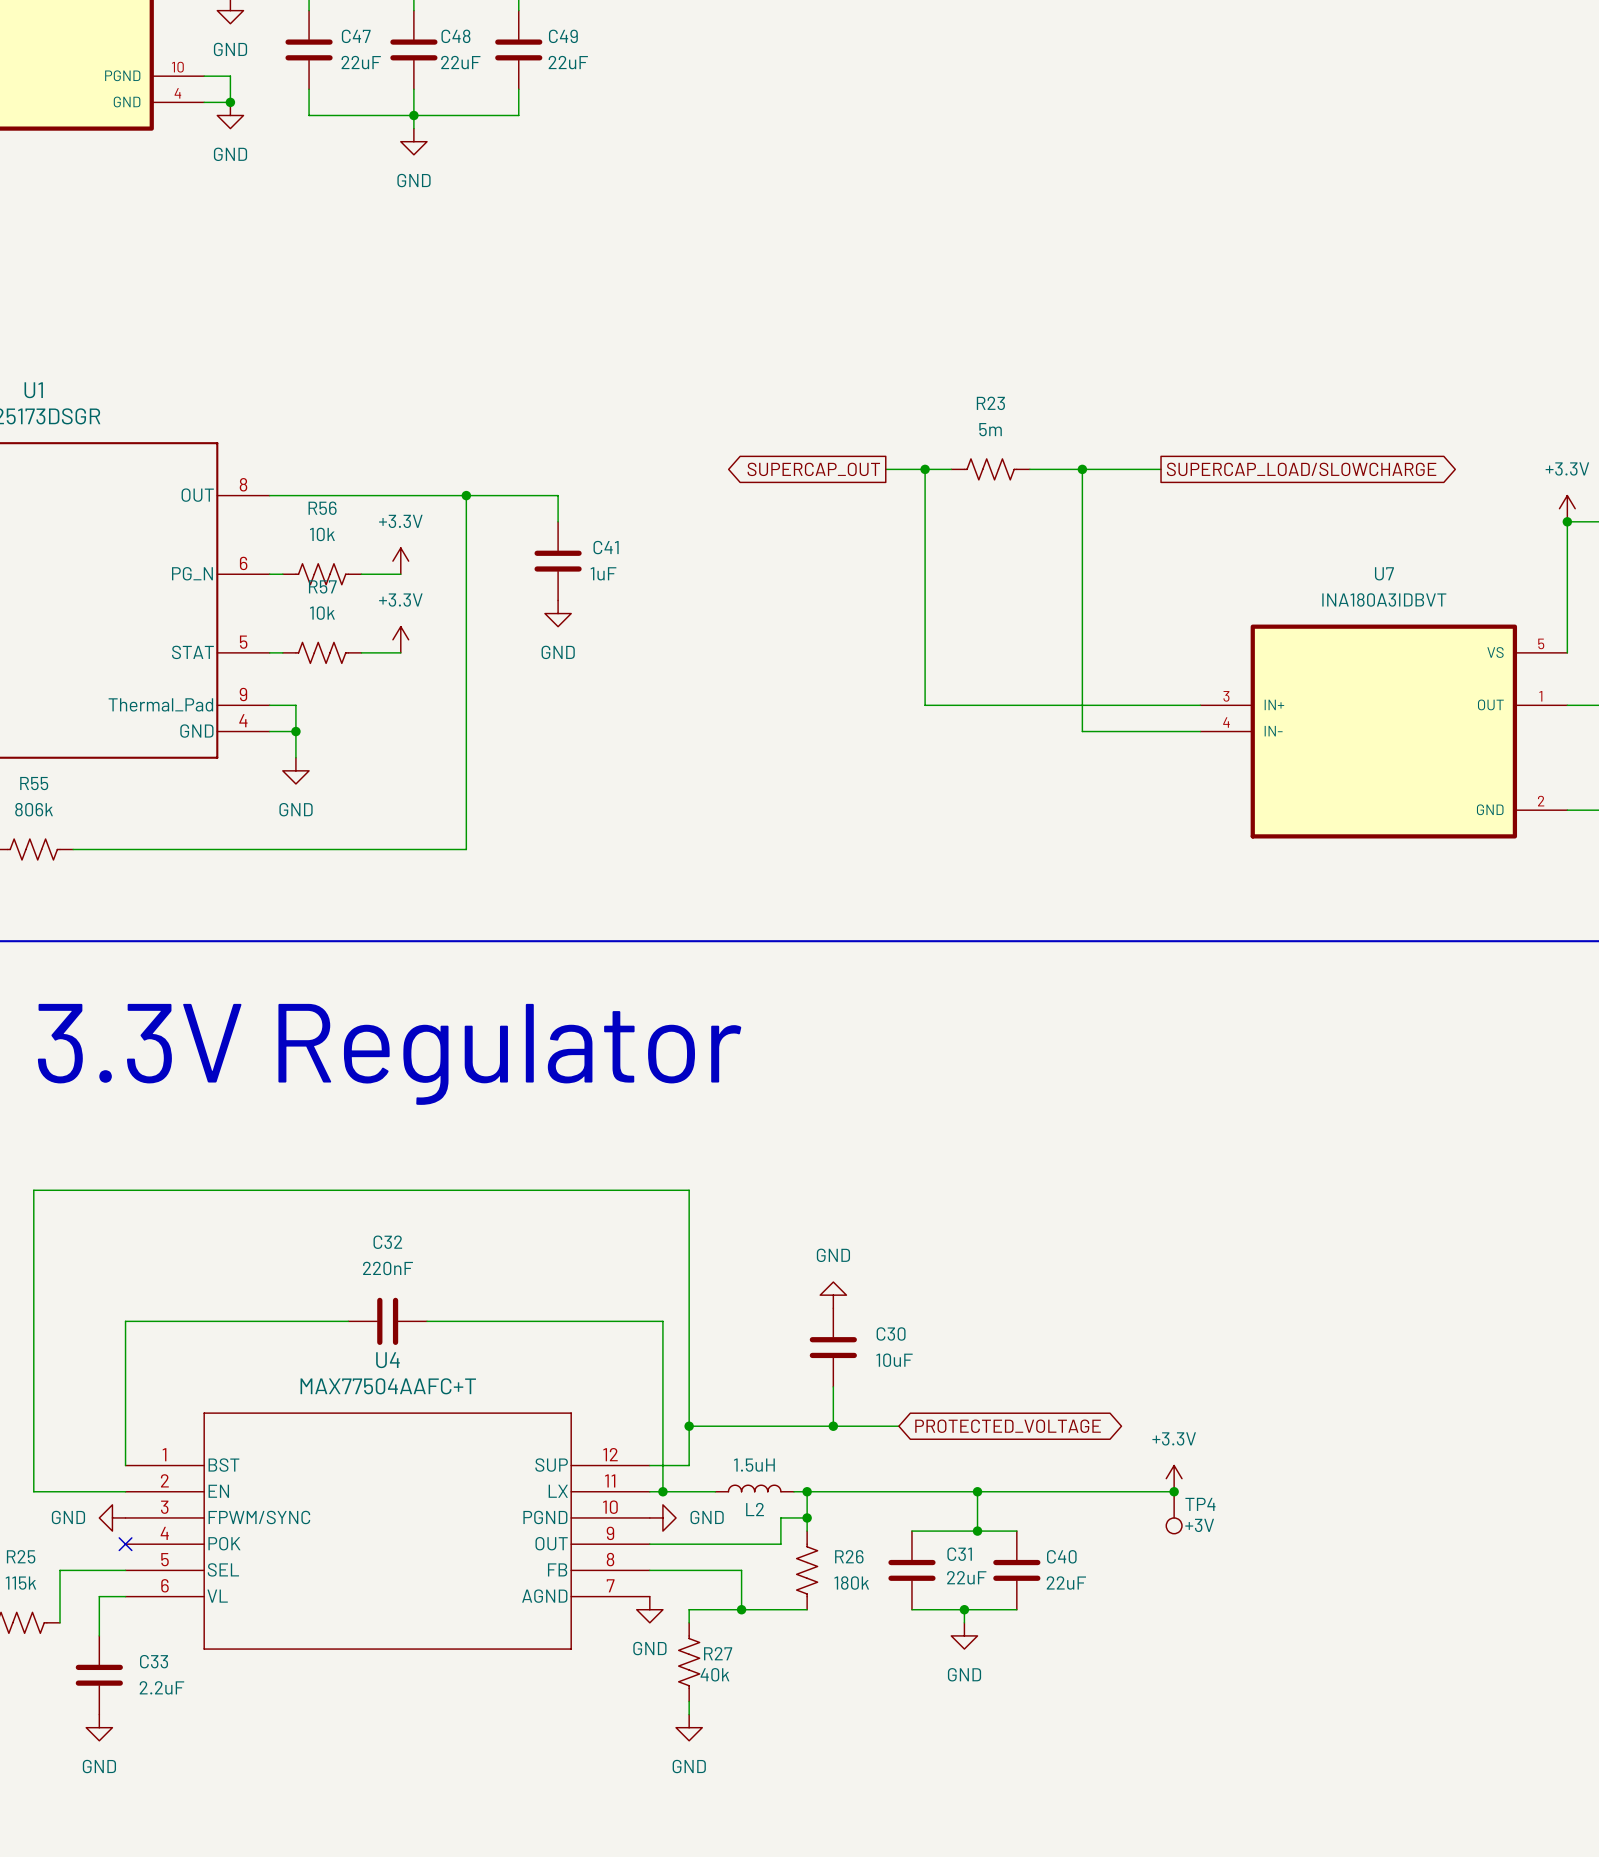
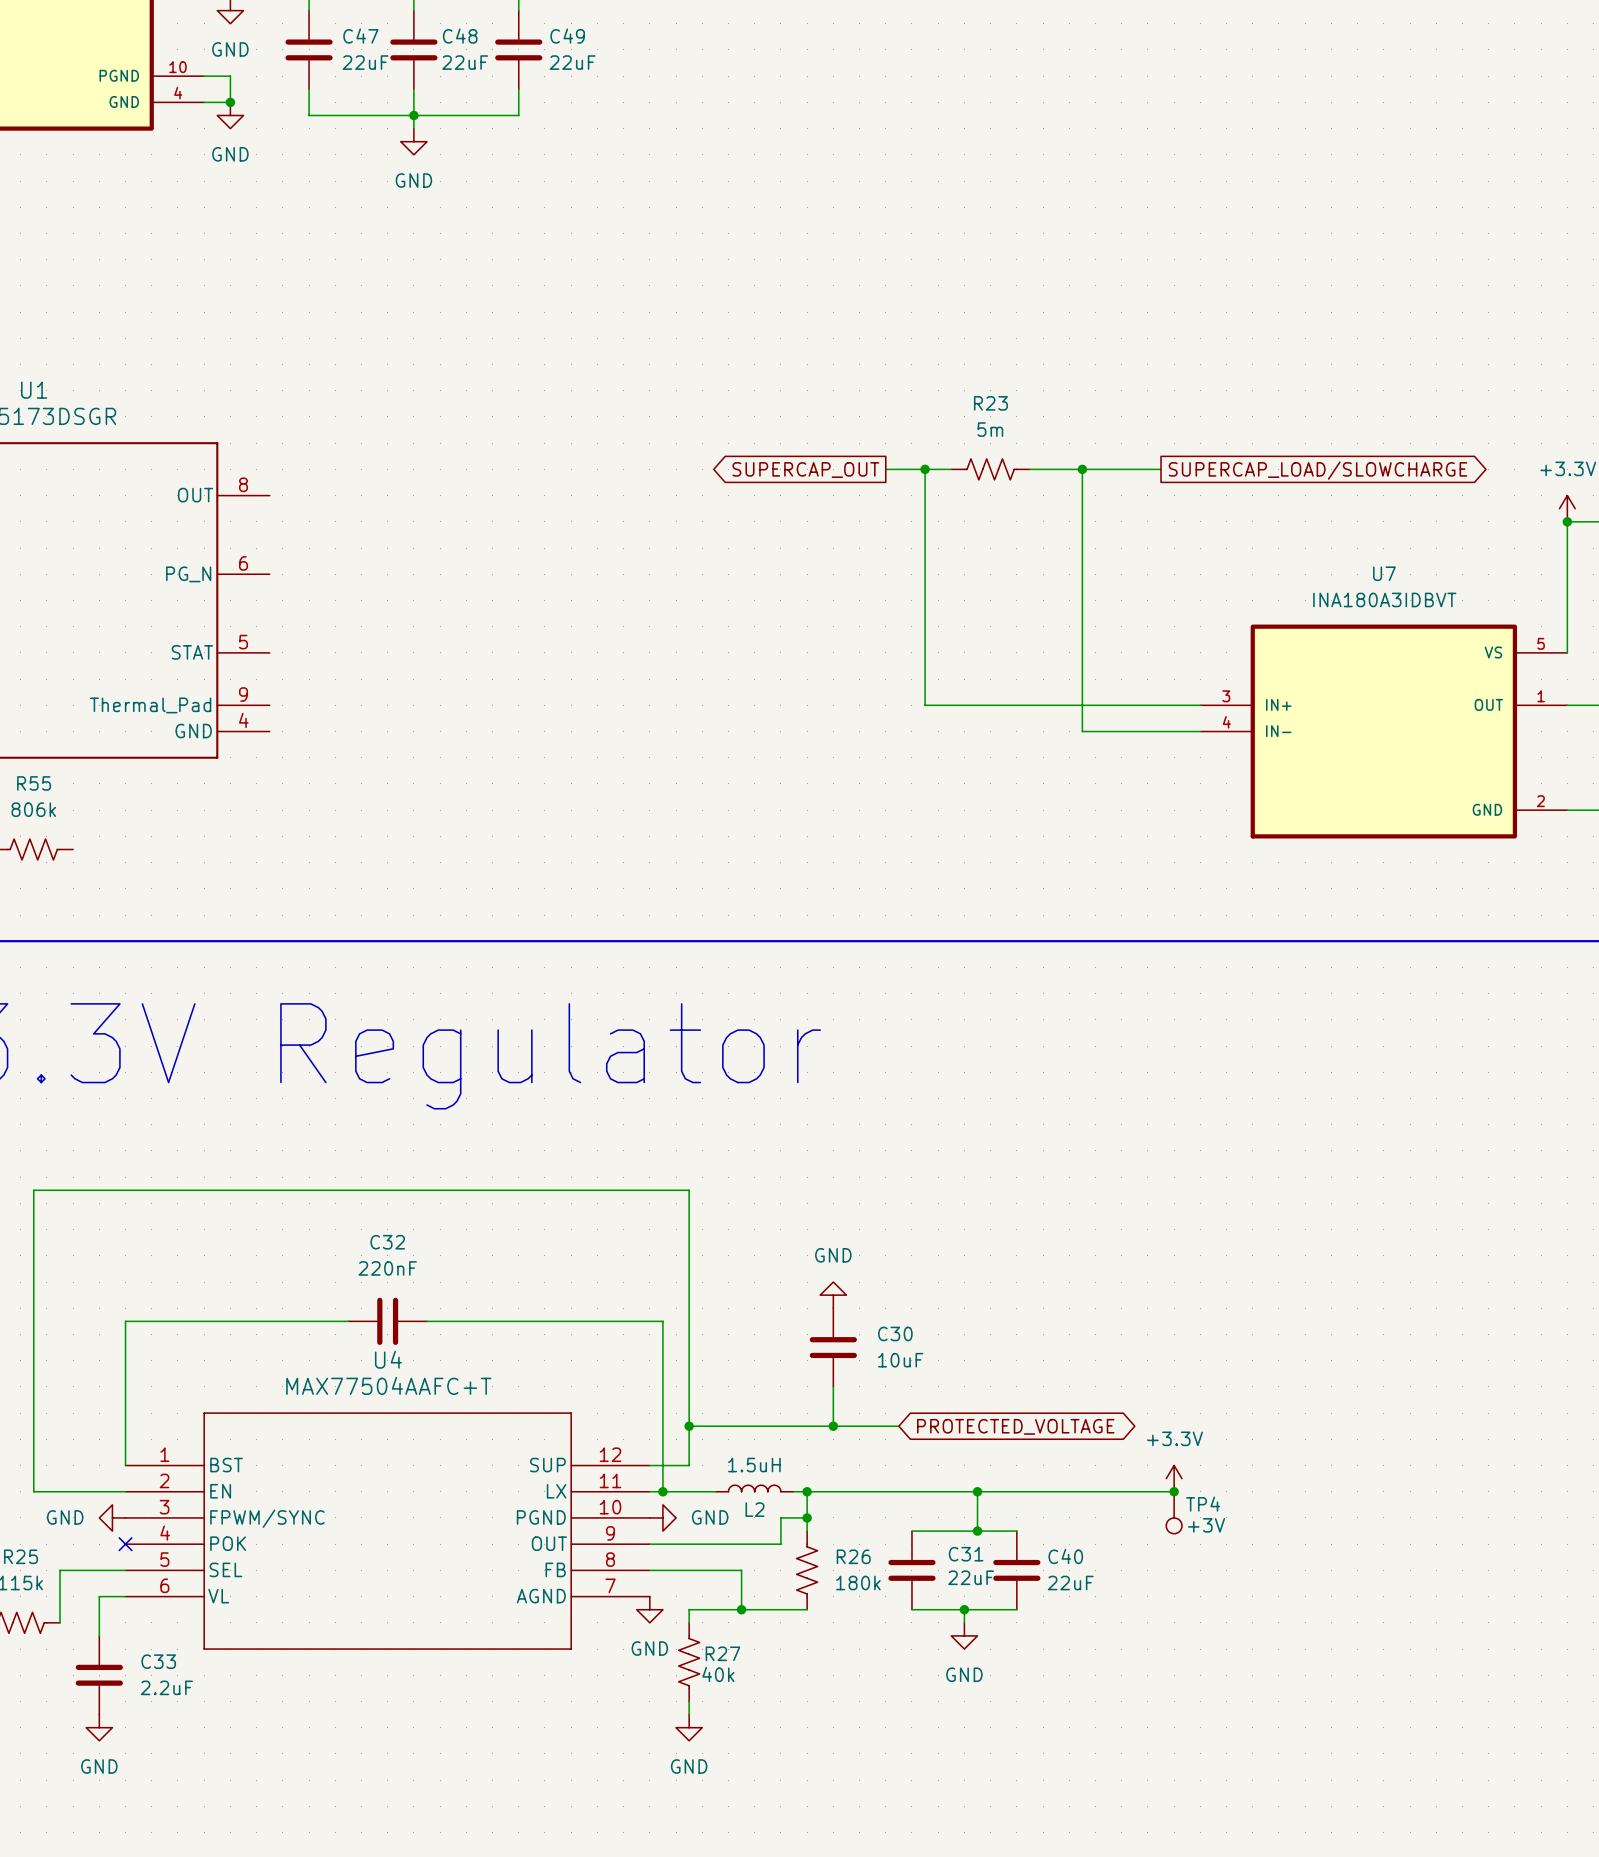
wire: (269, 495) (558, 495) (558, 521) -> none
wire: (466, 495) (466, 849) (73, 849) -> none
junction: (466, 495) -> none
power symbol: +3.3V (400, 561) -> none
C41: 1uF (558, 561) -> none
wire: (269, 574) (282, 574) -> none
R56: 10k (322, 574) -> none
wire: (361, 574) (400, 574) -> none
power symbol: GND (558, 613) -> none
power symbol: +3.3V (400, 639) -> none
wire: (269, 652) (282, 652) -> none
R57: 10k (322, 652) -> none
wire: (361, 652) (400, 652) -> none
wire: (269, 705) (295, 705) (295, 757) -> none
wire: (269, 731) (295, 731) -> none
junction: (295, 731) -> none
power symbol: GND (295, 770) -> none

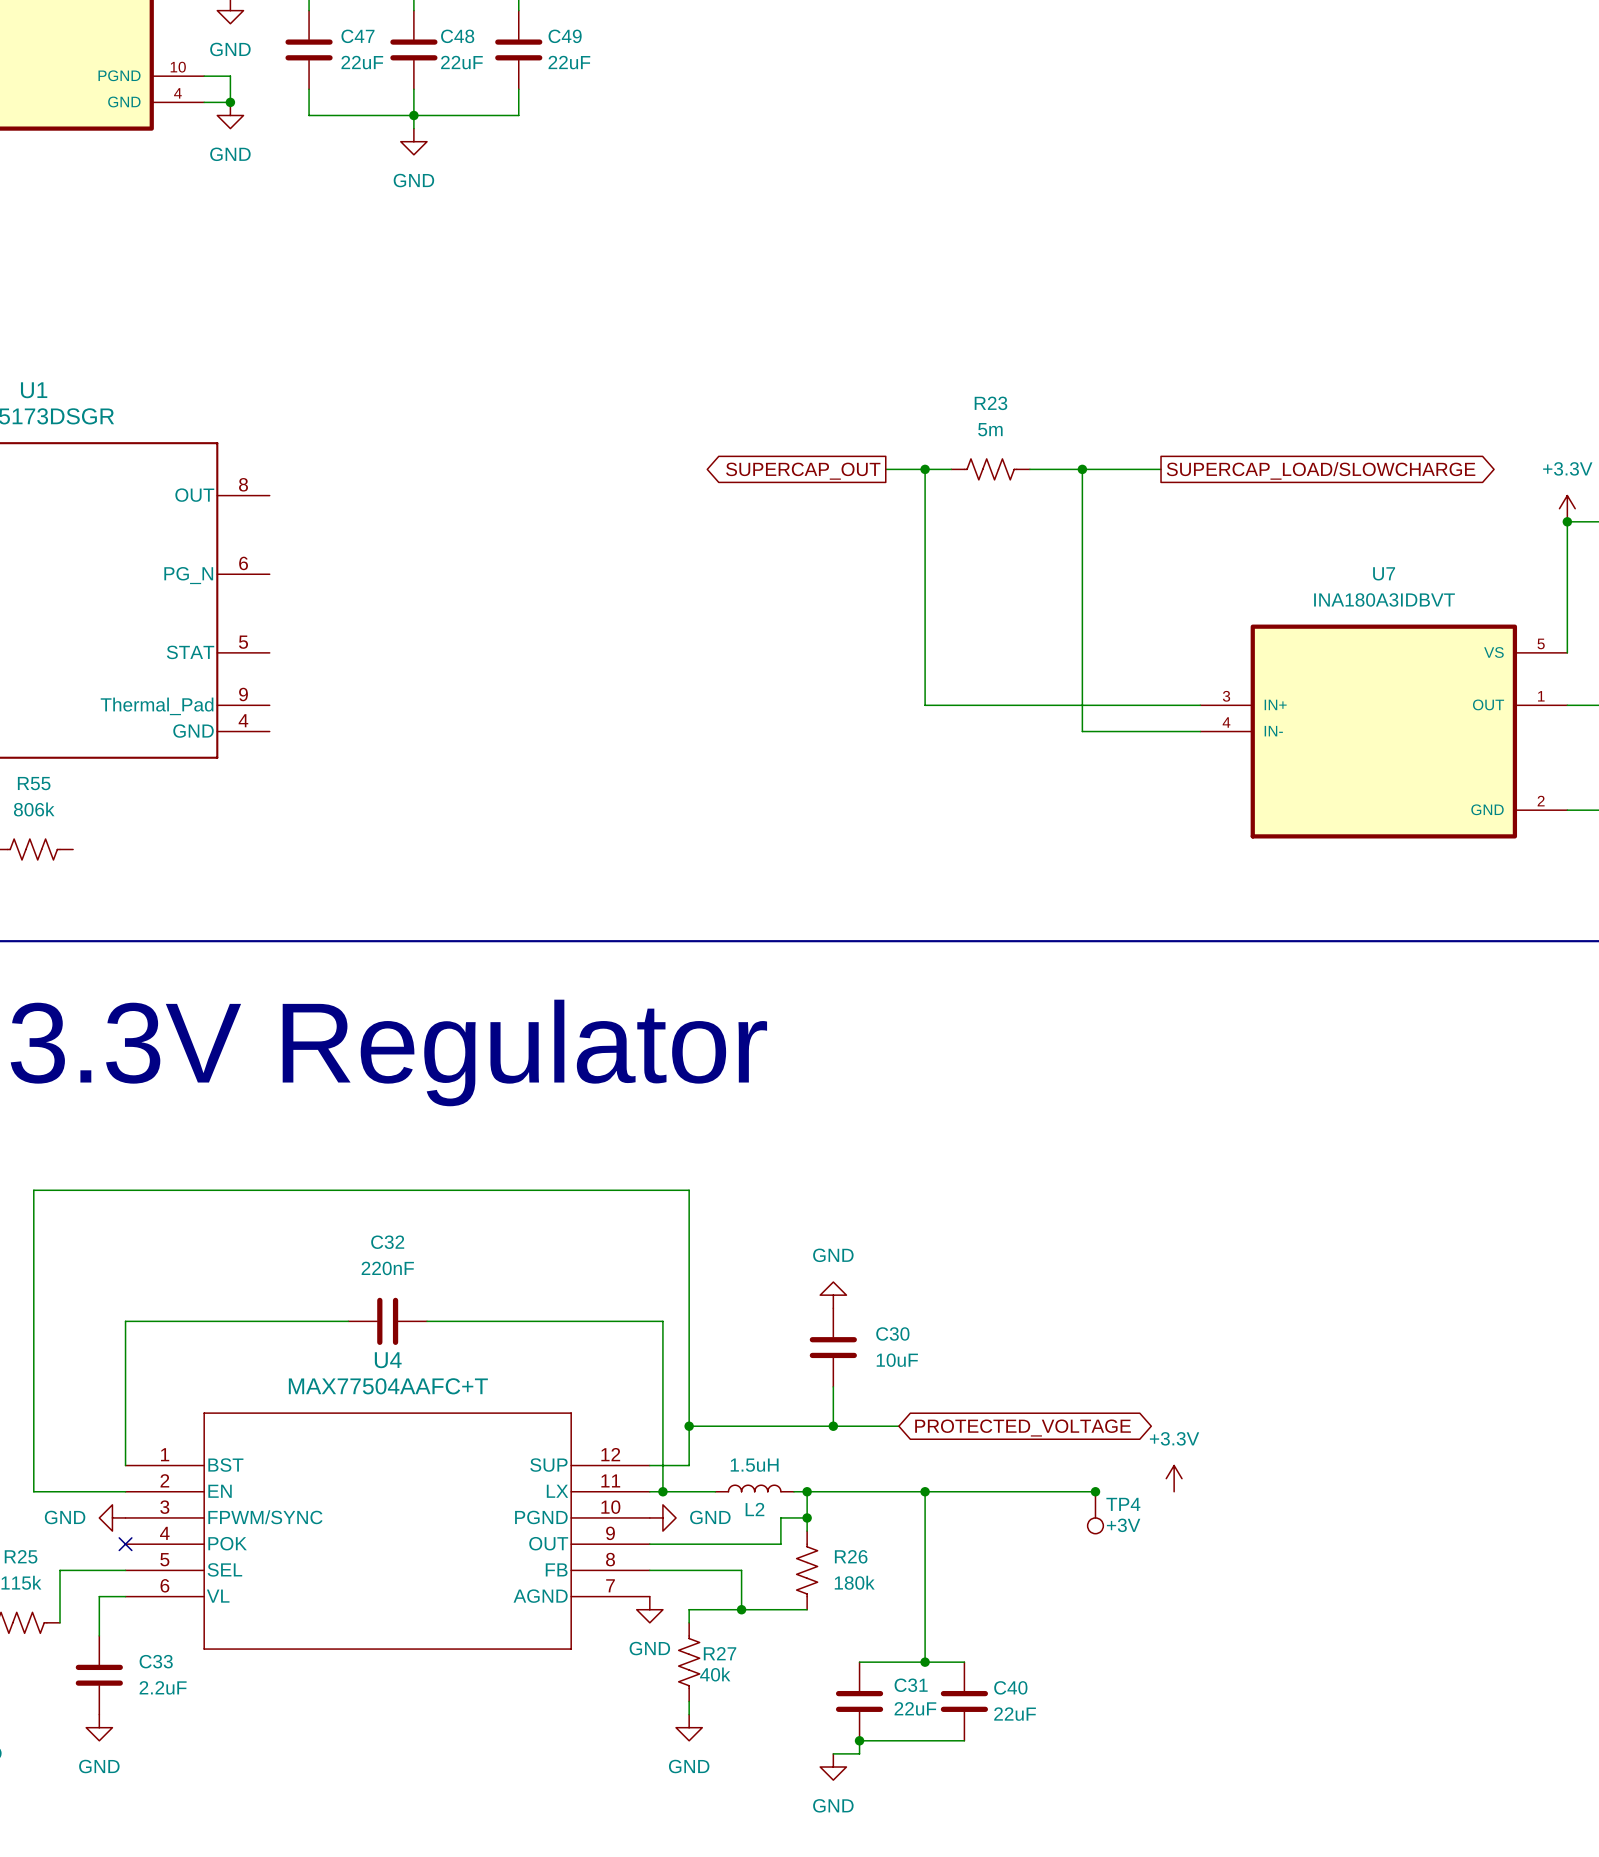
wire: none -> (925, 1491) (925, 1662)
junction: none -> (925, 1491)
wire: (977, 1491) (977, 1531) -> none
junction: (977, 1491) -> none
wire: (1095, 1491) (1174, 1491) -> none
junction: none -> (1095, 1491)
junction: (1174, 1491) -> none
TP4 position: (1174, 1512) -> (1095, 1512)
wire: (911, 1531) (1016, 1531) -> none
junction: (977, 1531) -> none
C31 position: (911, 1570) -> (859, 1701)
C40 position: (1016, 1570) -> (964, 1701)
wire: (911, 1609) (1016, 1609) -> (859, 1662) (964, 1662)
wire: (964, 1609) (964, 1622) -> none
junction: (964, 1609) -> none
power symbol position: GND (964, 1635) -> GND (833, 1767)
junction: none -> (925, 1662)
junction: none -> (859, 1740)
wire: none -> (964, 1740) (859, 1740) (859, 1753) (833, 1753)

